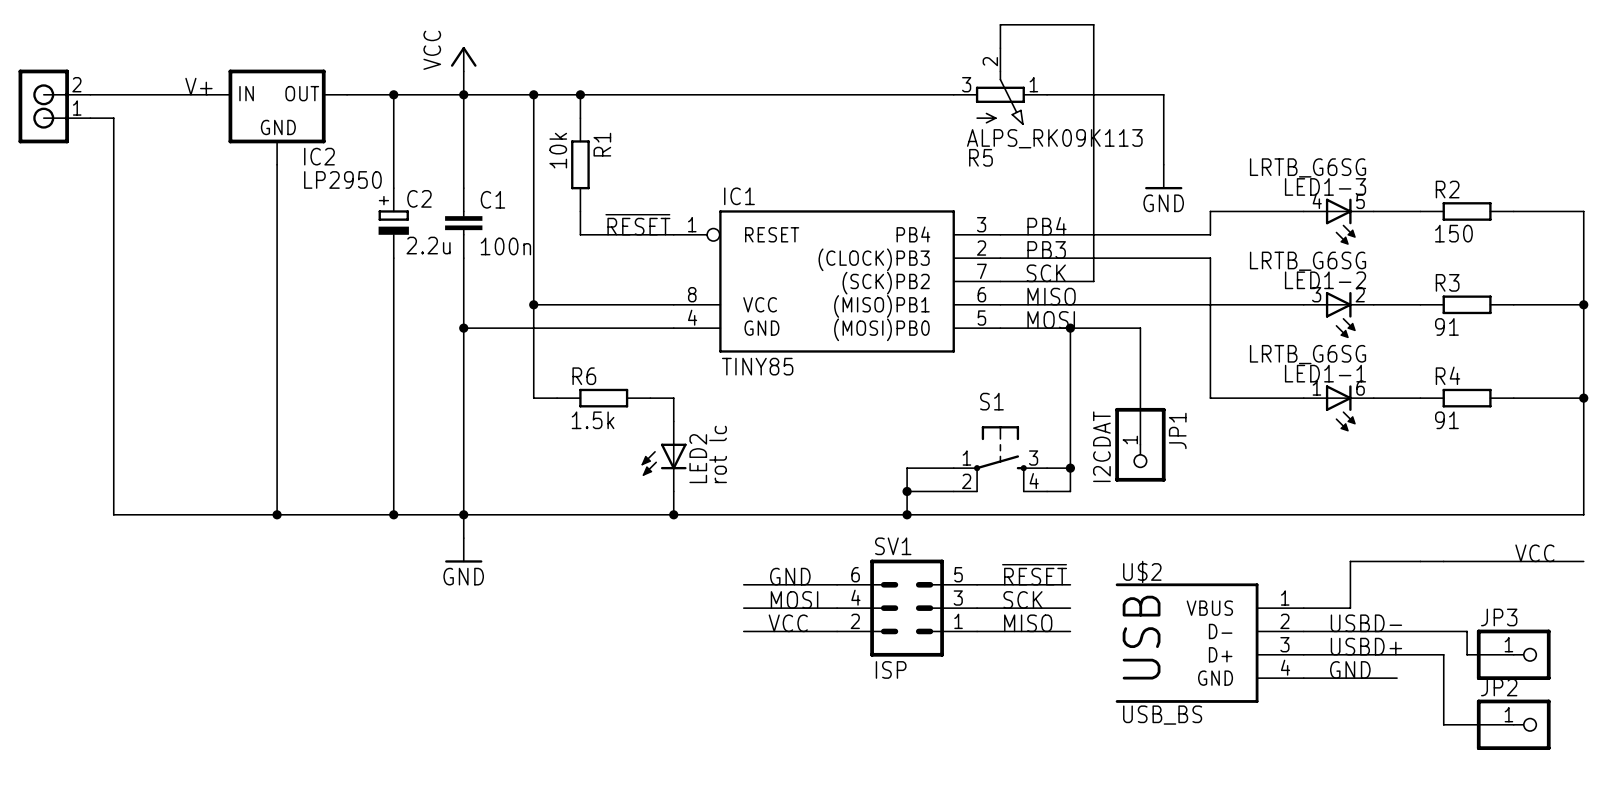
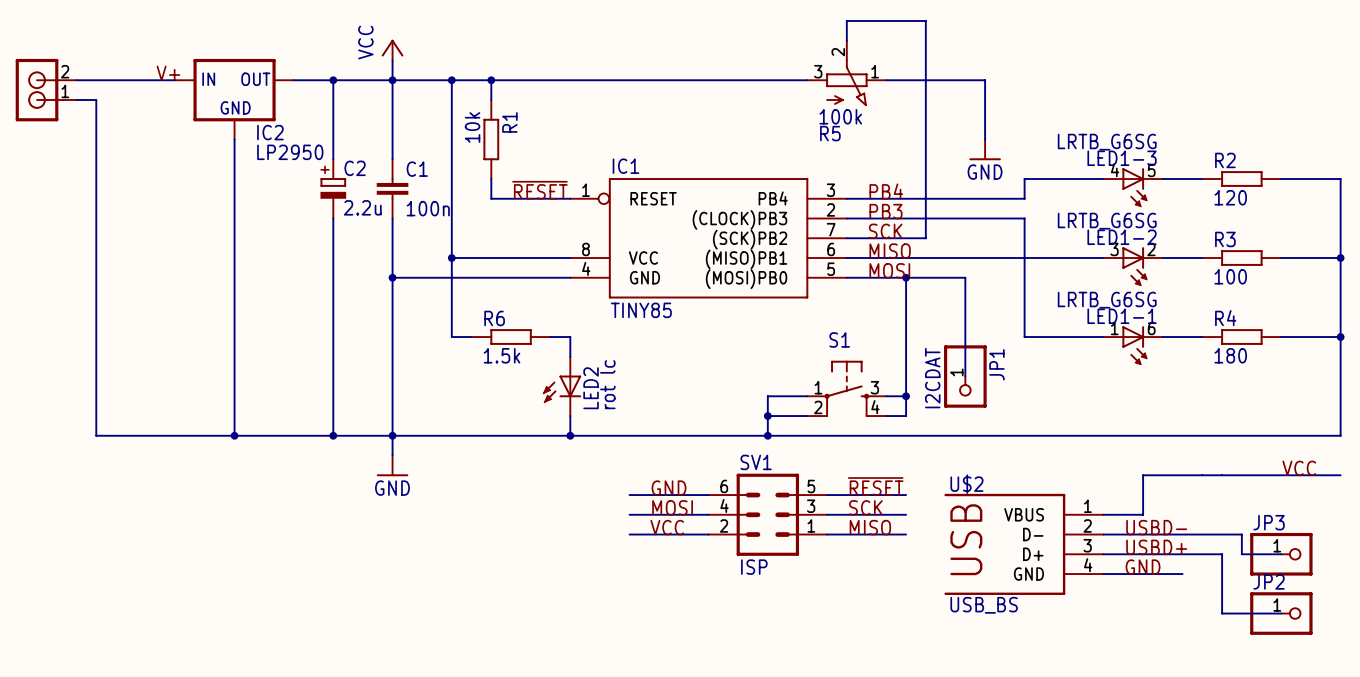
R5 value: ALPS_RK09K113 (1054, 138) -> 100k (840, 116)
R2 value: 150 (1453, 233) -> 120 (1230, 197)
R3 value: 91 (1446, 326) -> 100 (1230, 276)
R4 value: 91 (1446, 420) -> 180 (1230, 355)

